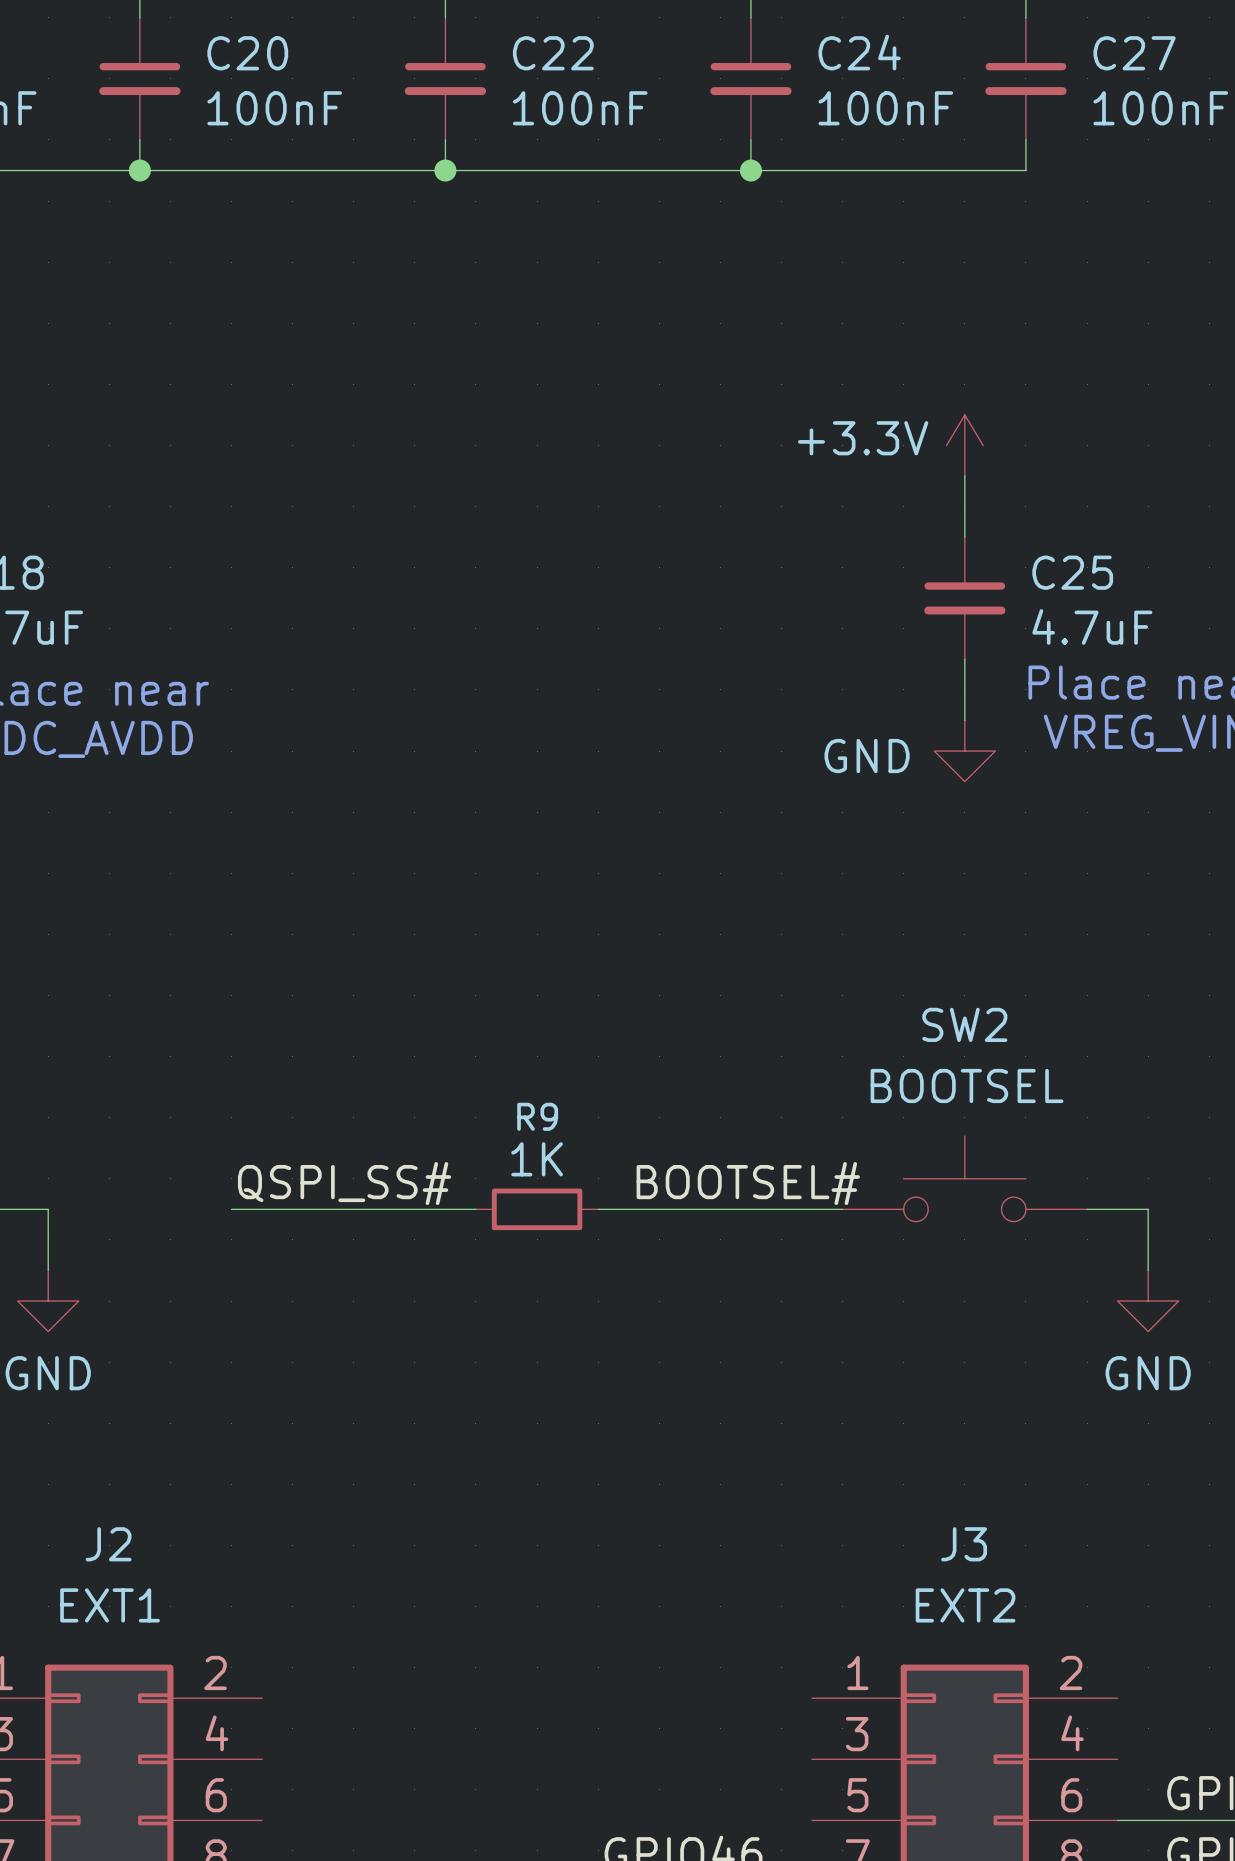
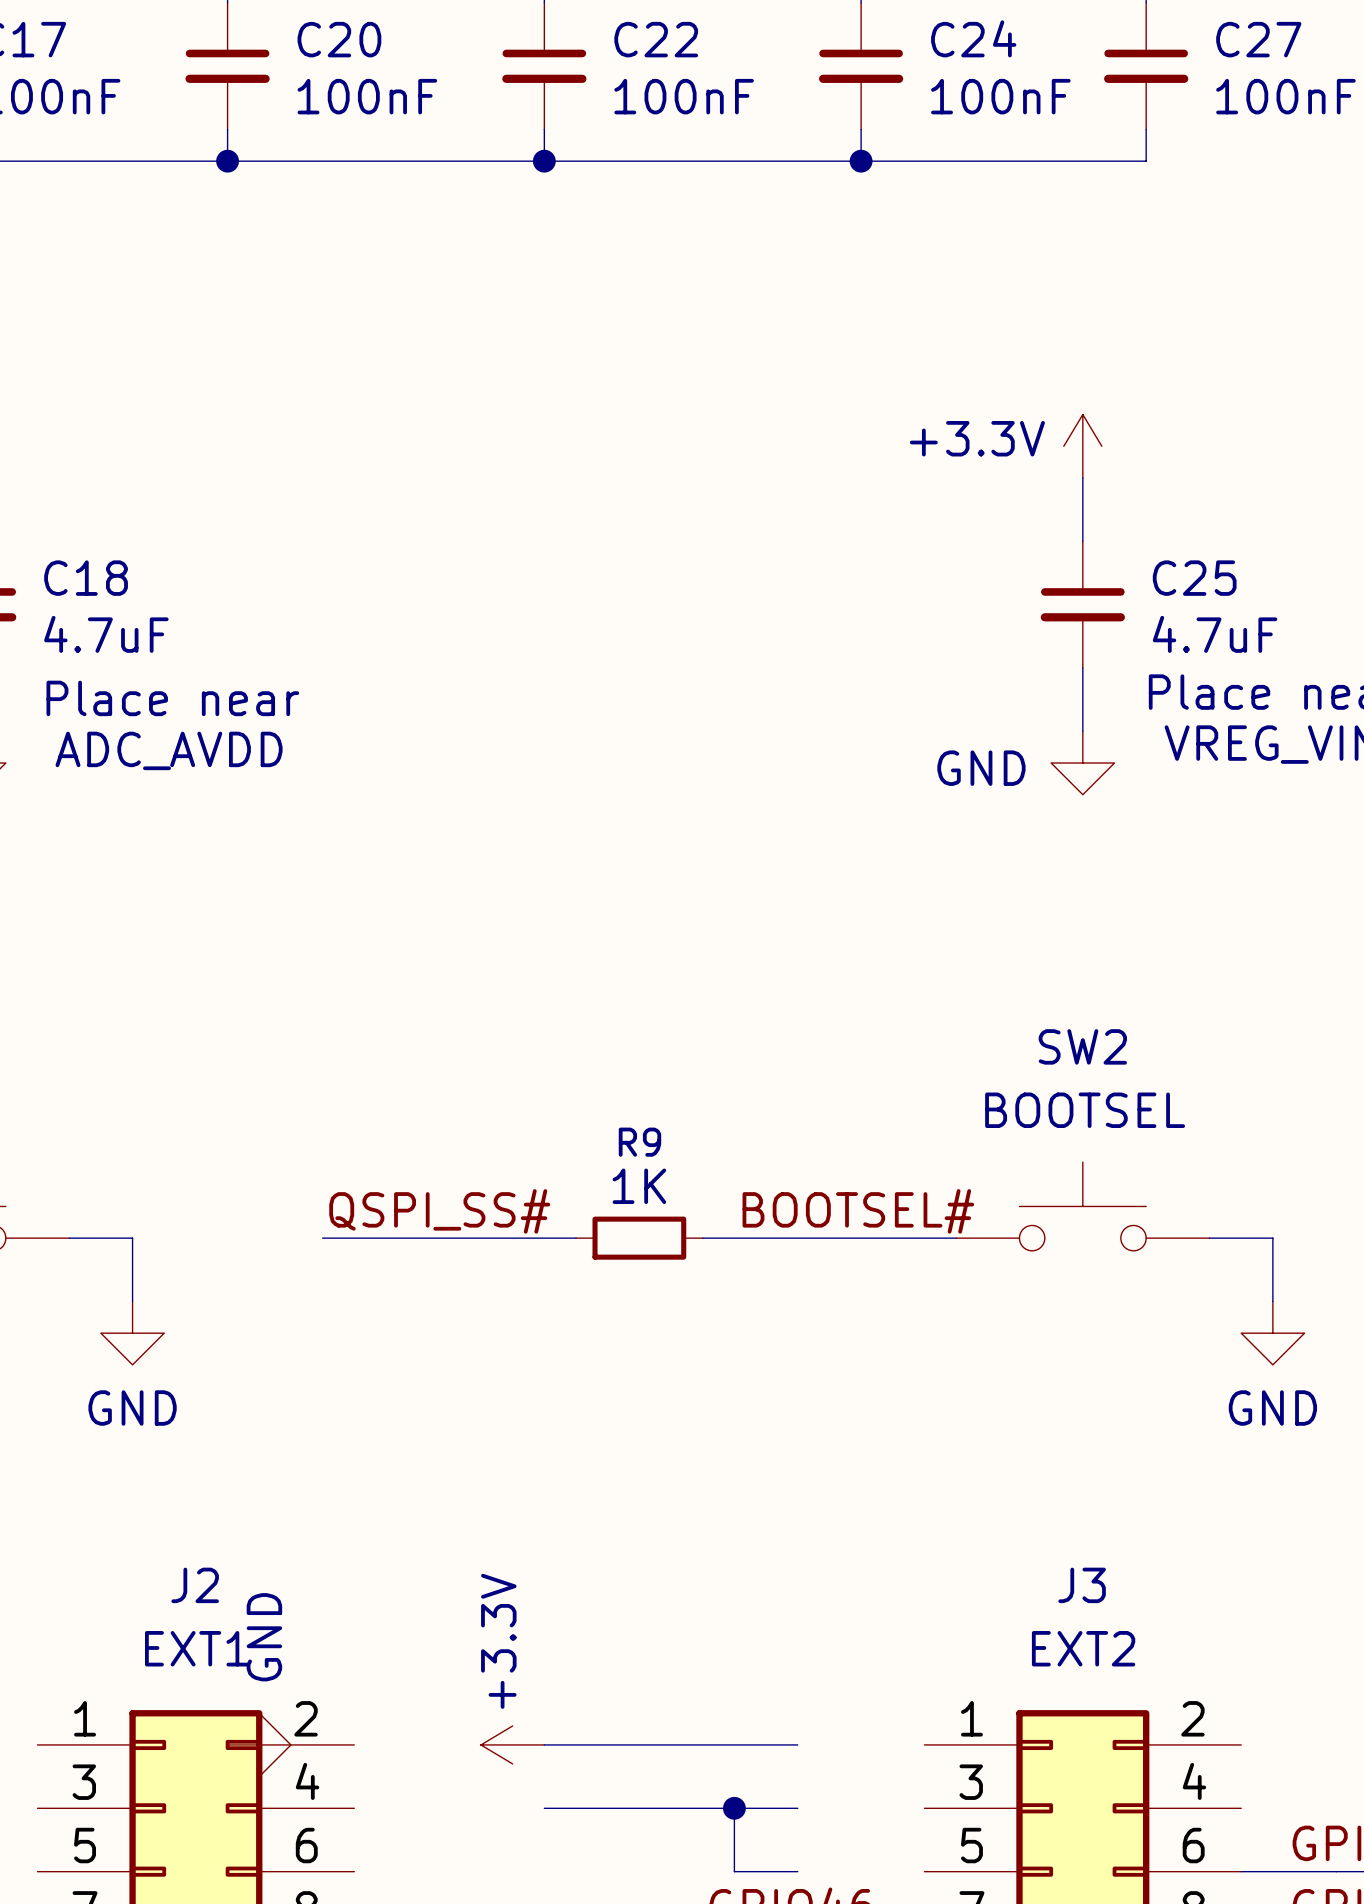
power symbol: none -> GND (259, 1744)
power symbol: none -> +3.3V (512, 1744)
wire: none -> (544, 1744) (797, 1744)
wire: none -> (544, 1808) (797, 1808)
wire: none -> (734, 1808) (734, 1871) (797, 1871)
junction: none -> (734, 1808)

